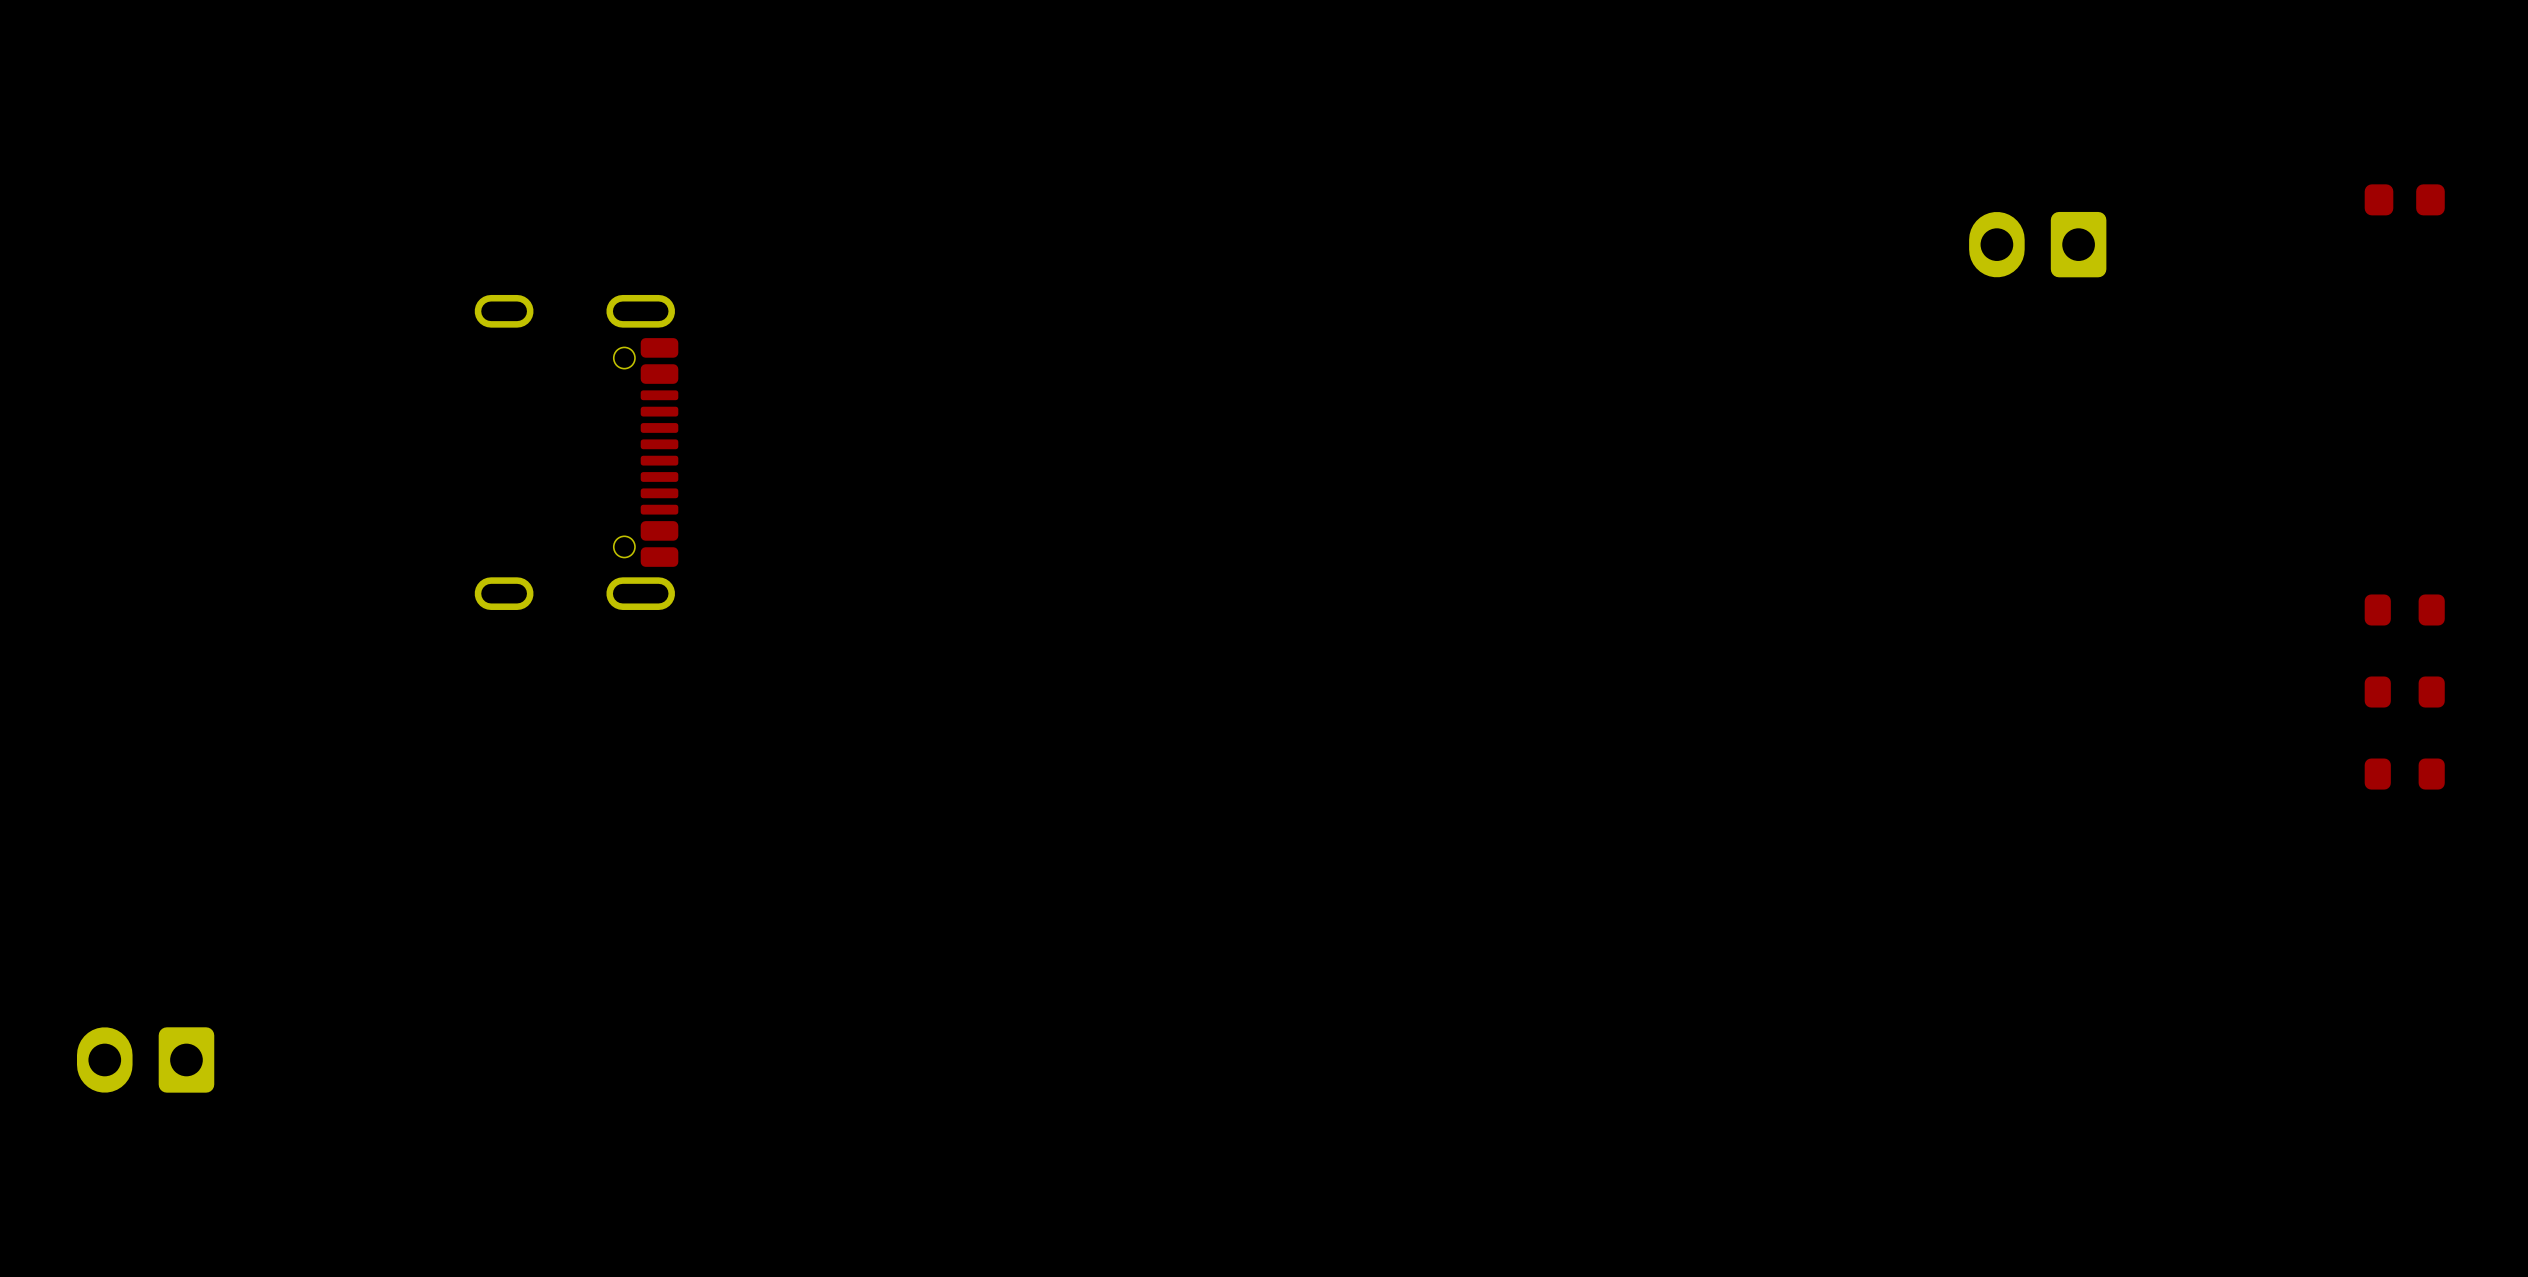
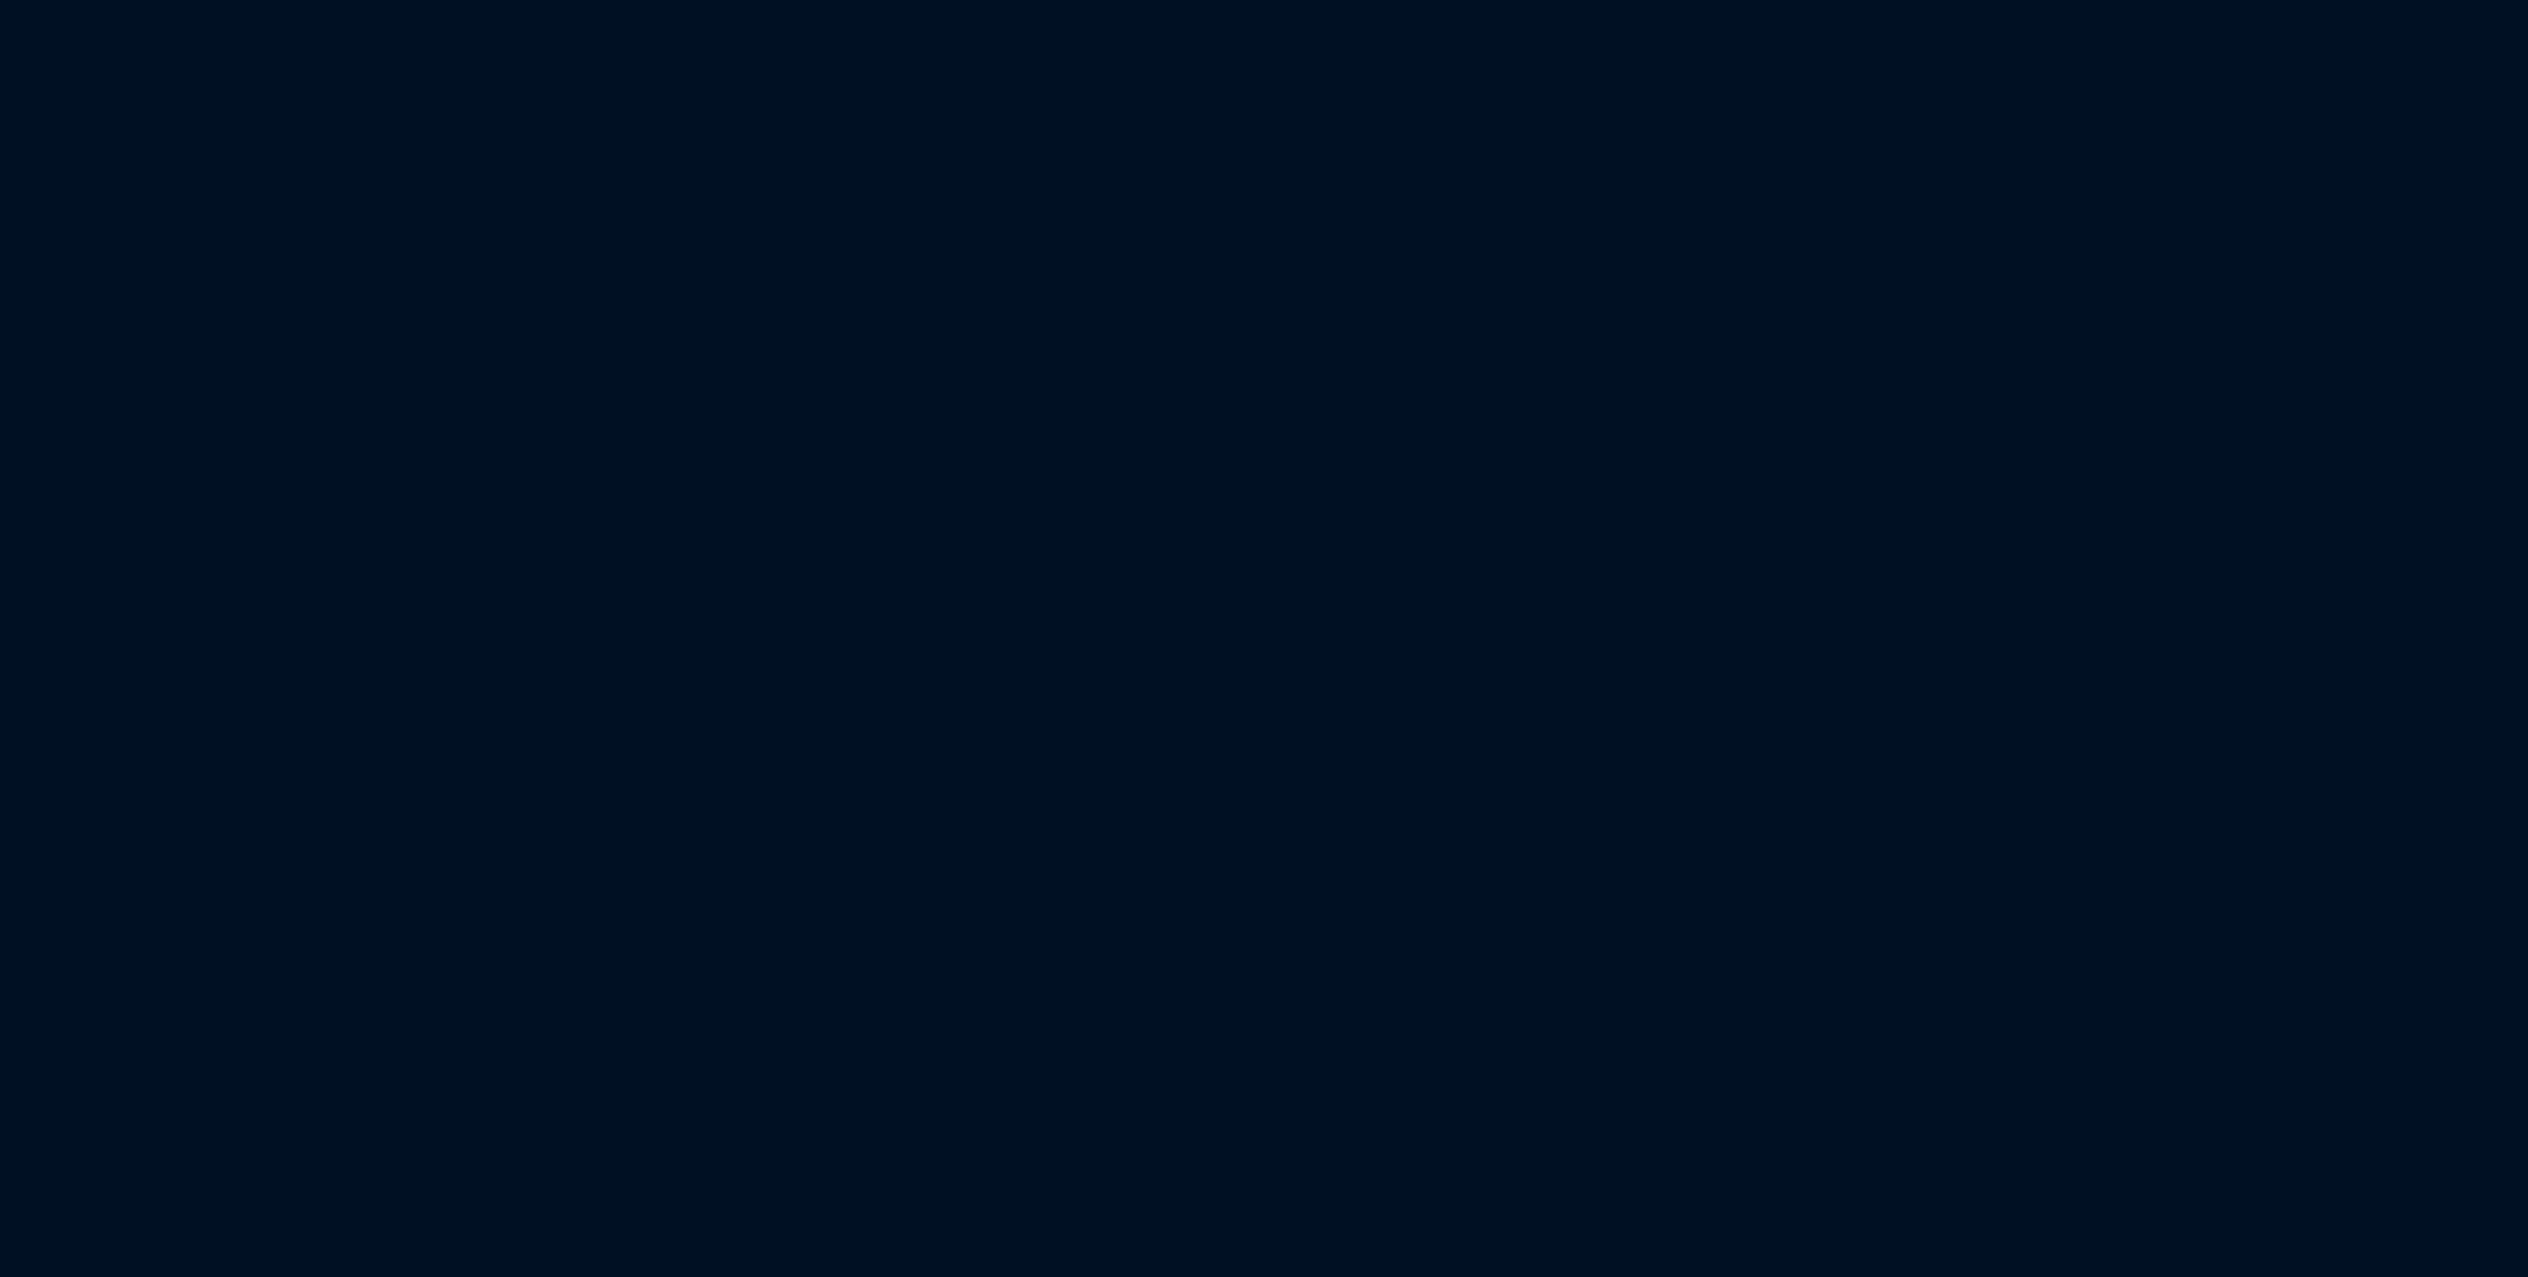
part: (2404, 199) -> none
part: (2037, 244) -> none
part: (576, 452) -> none
part: (2404, 609) -> none
part: (2404, 692) -> none
part: (2404, 774) -> none
part: (145, 1059) -> none

